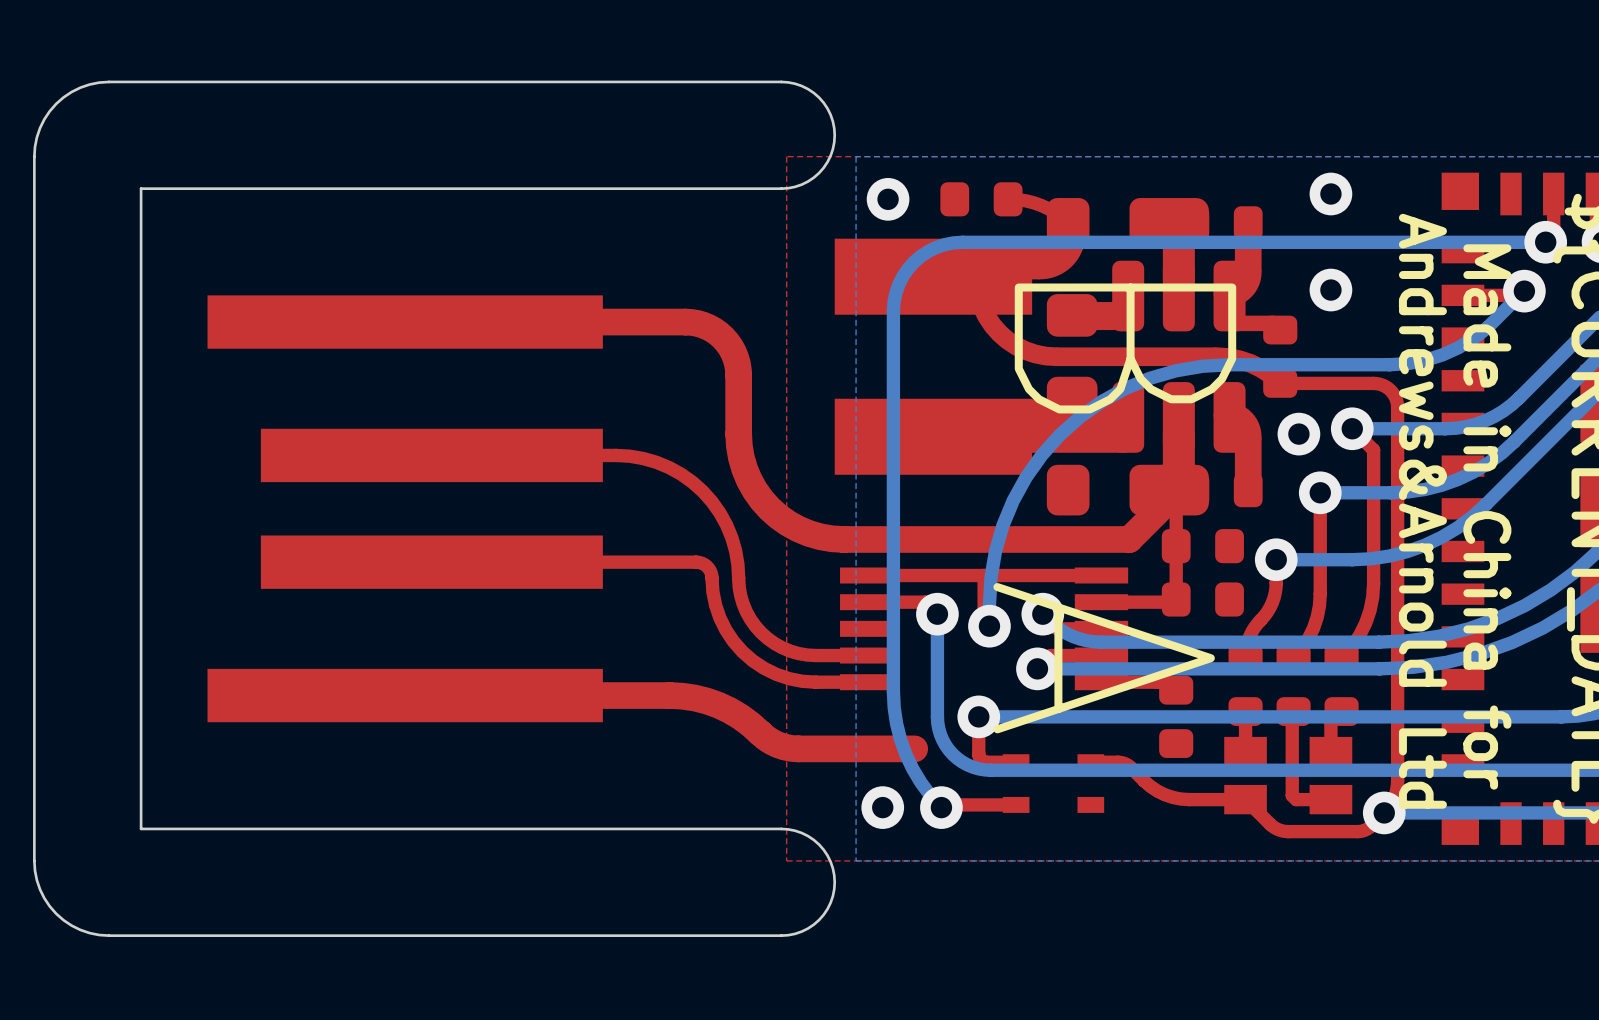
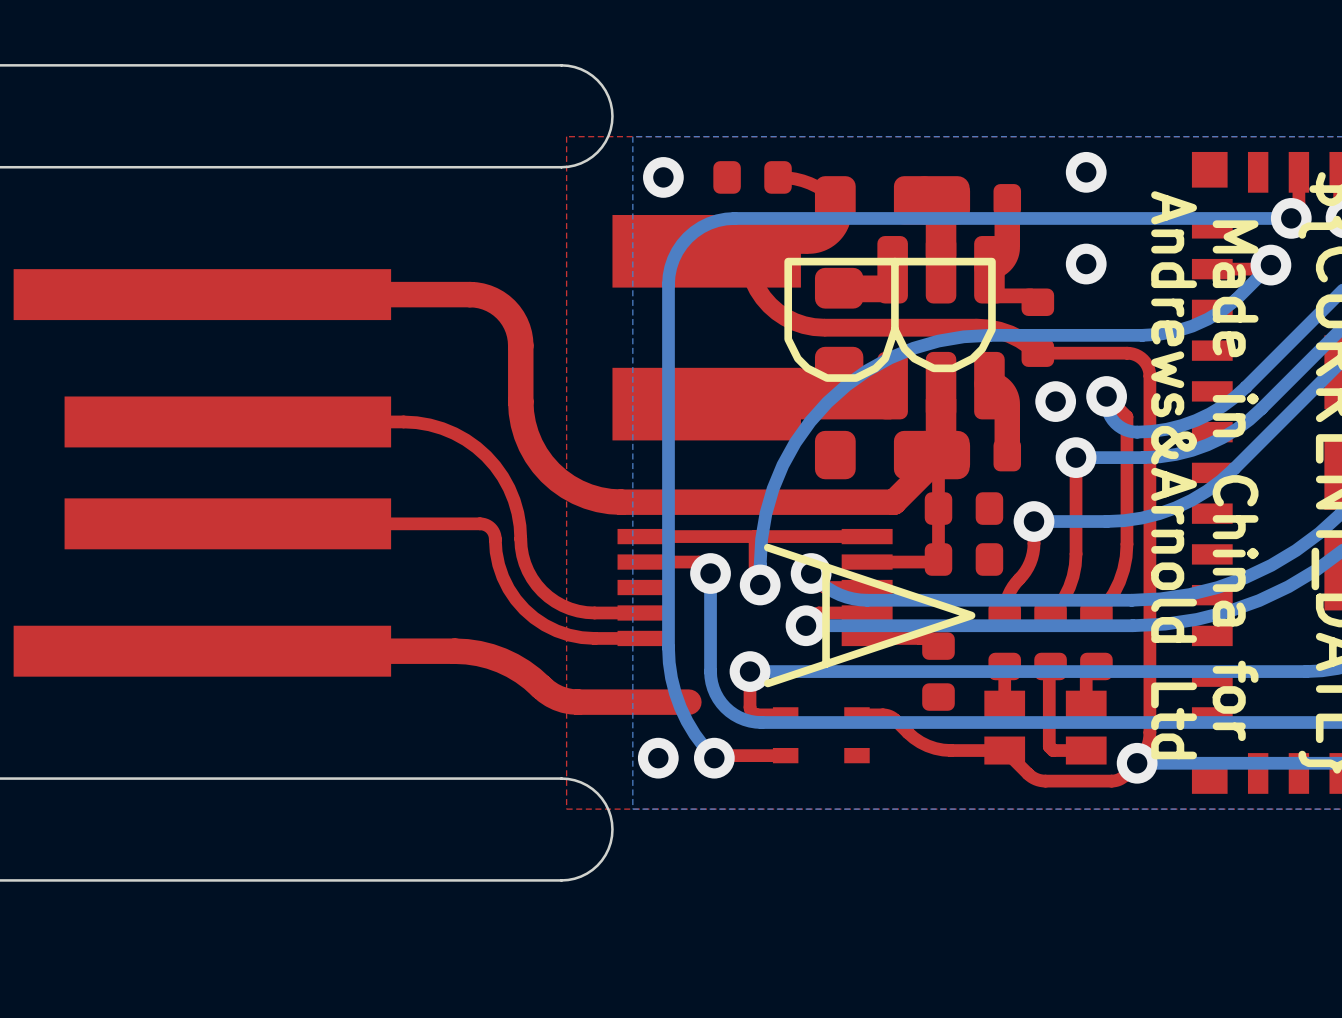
bottom track: (1519, 398) (1494, 416) (1465, 426) (1445, 428) (1352, 428) -> (1265, 367) (1222, 406) (1196, 420) (1167, 429) (1137, 432) (1121, 428) (1115, 423) (1108, 413) (1106, 396)

